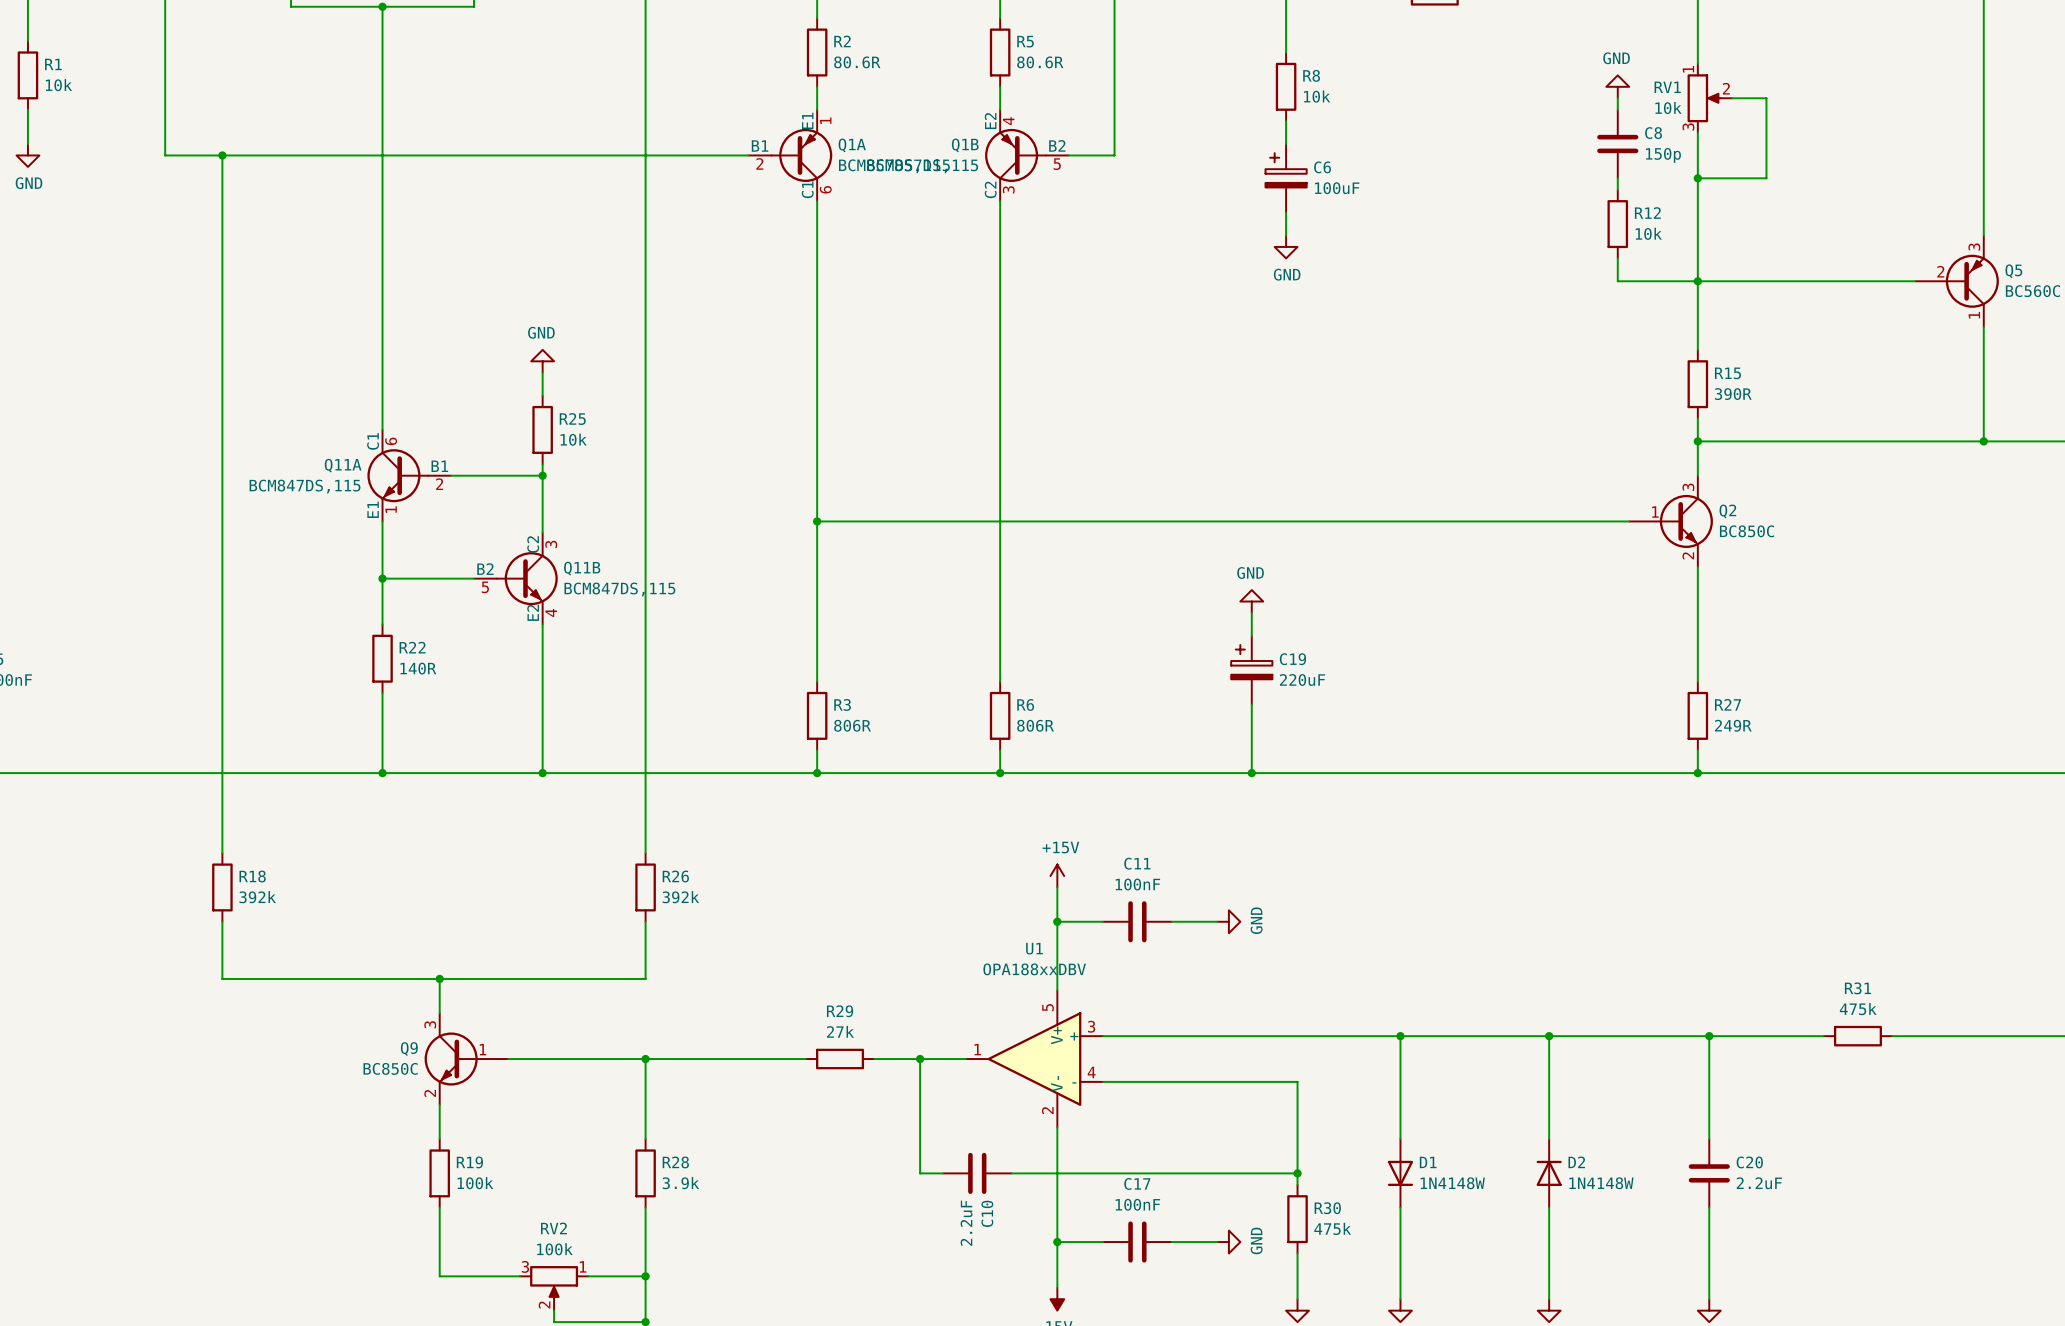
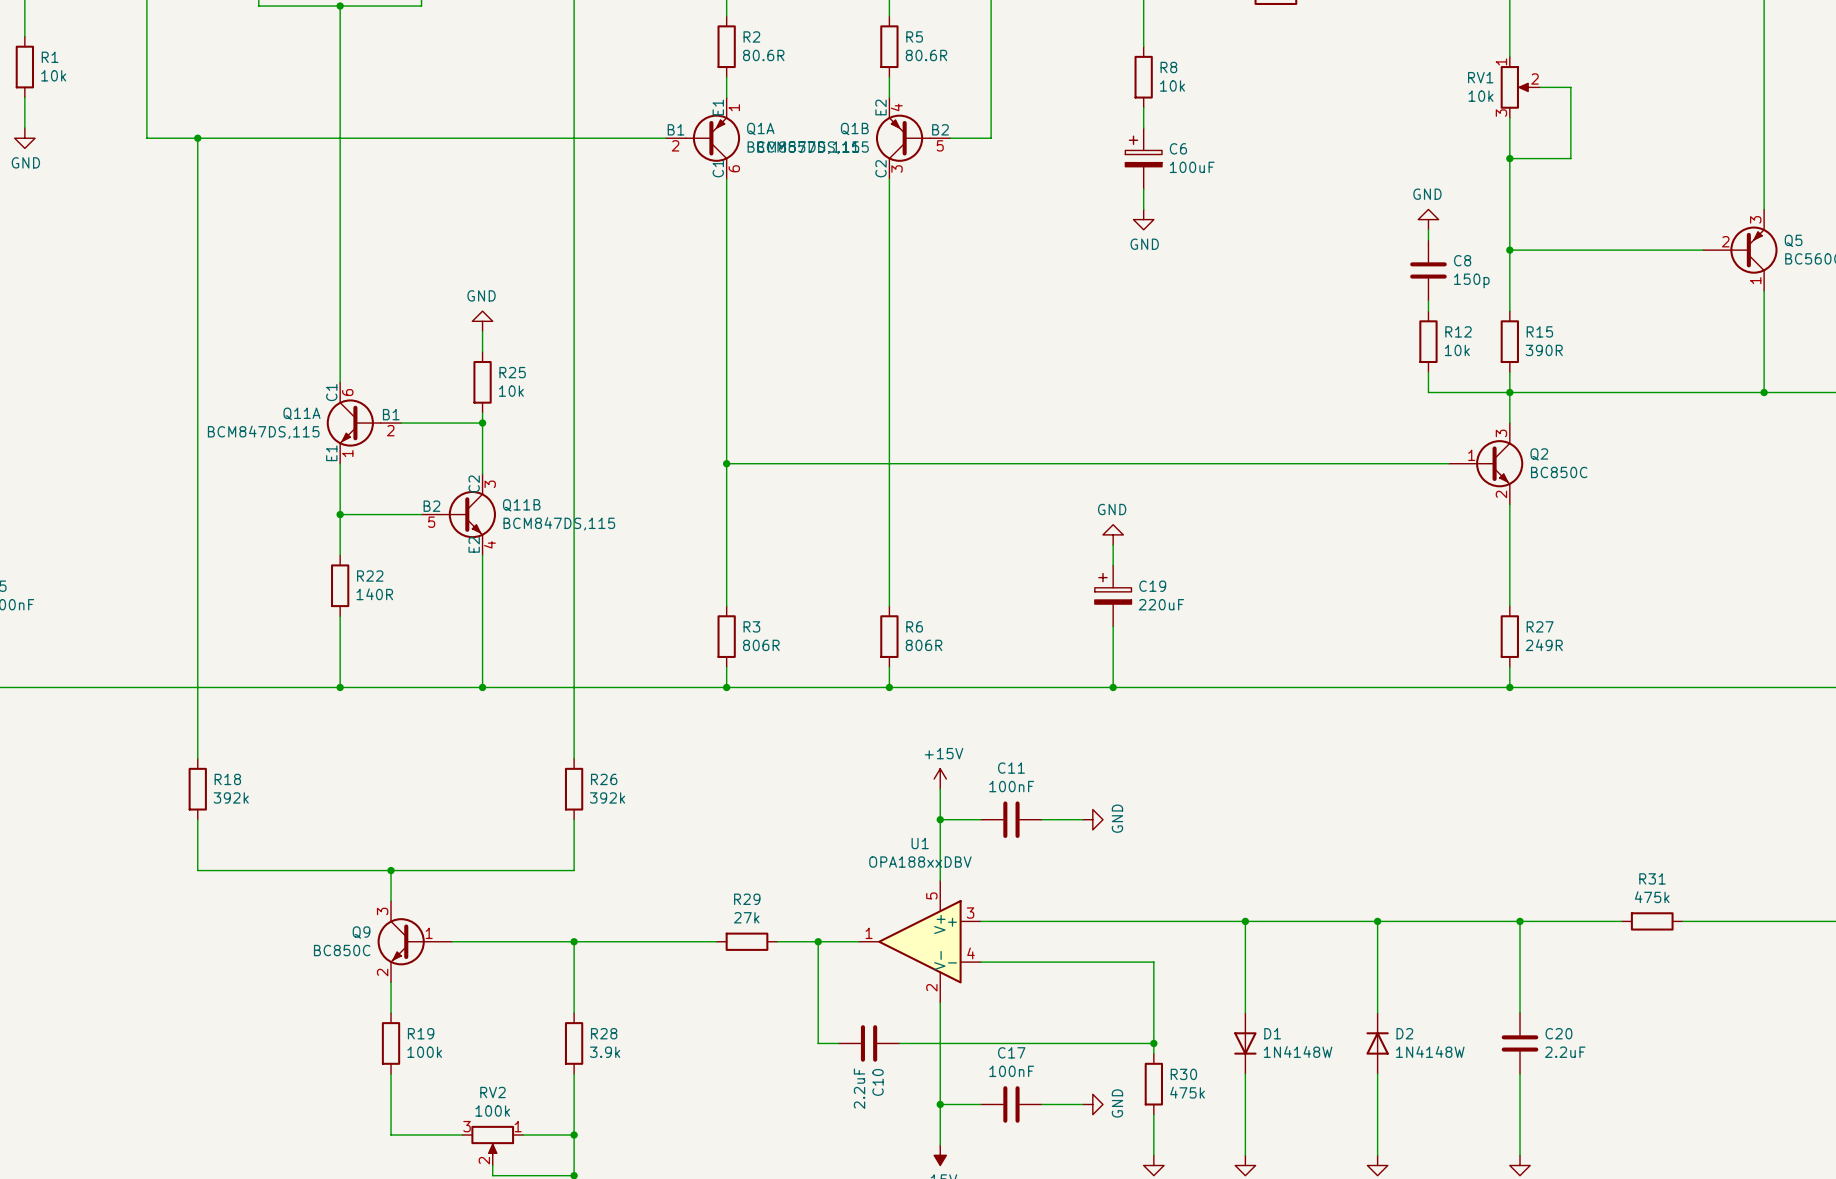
power symbol position: GND (1617, 86) -> GND (1428, 219)
wire: (1617, 98) (1617, 109) -> none
C8 position: (1617, 144) -> (1428, 270)
wire: (1617, 178) (1617, 189) -> (1428, 229) (1428, 239)
R12 position: (1617, 224) -> (1428, 341)
wire: (1617, 258) (1617, 281) (1697, 281) -> none
wire: none -> (1428, 300) (1428, 311)
wire: none -> (1428, 372) (1428, 392) (1509, 392)

